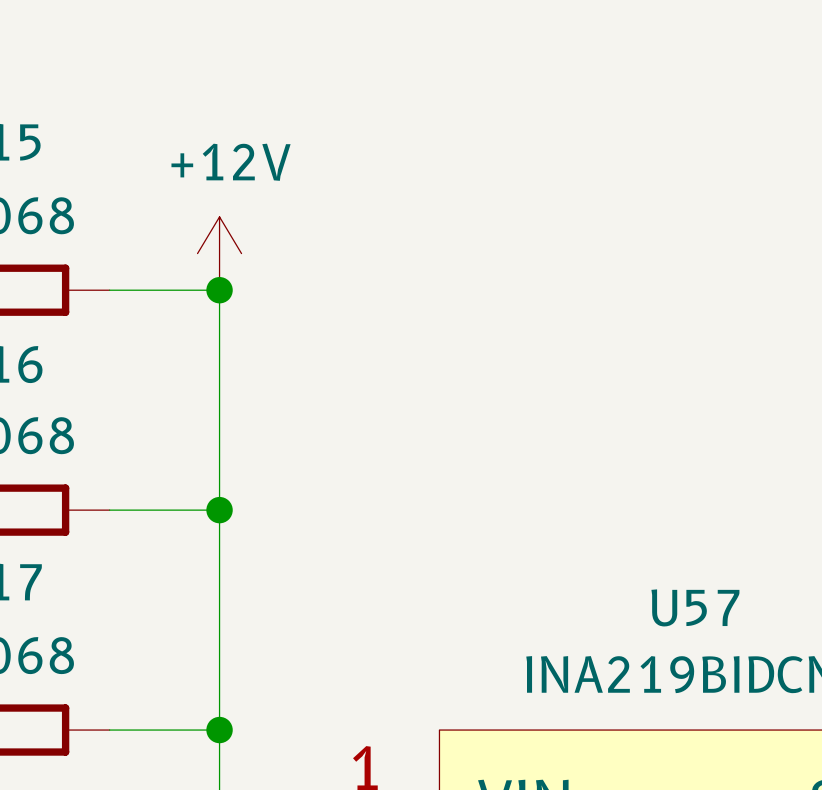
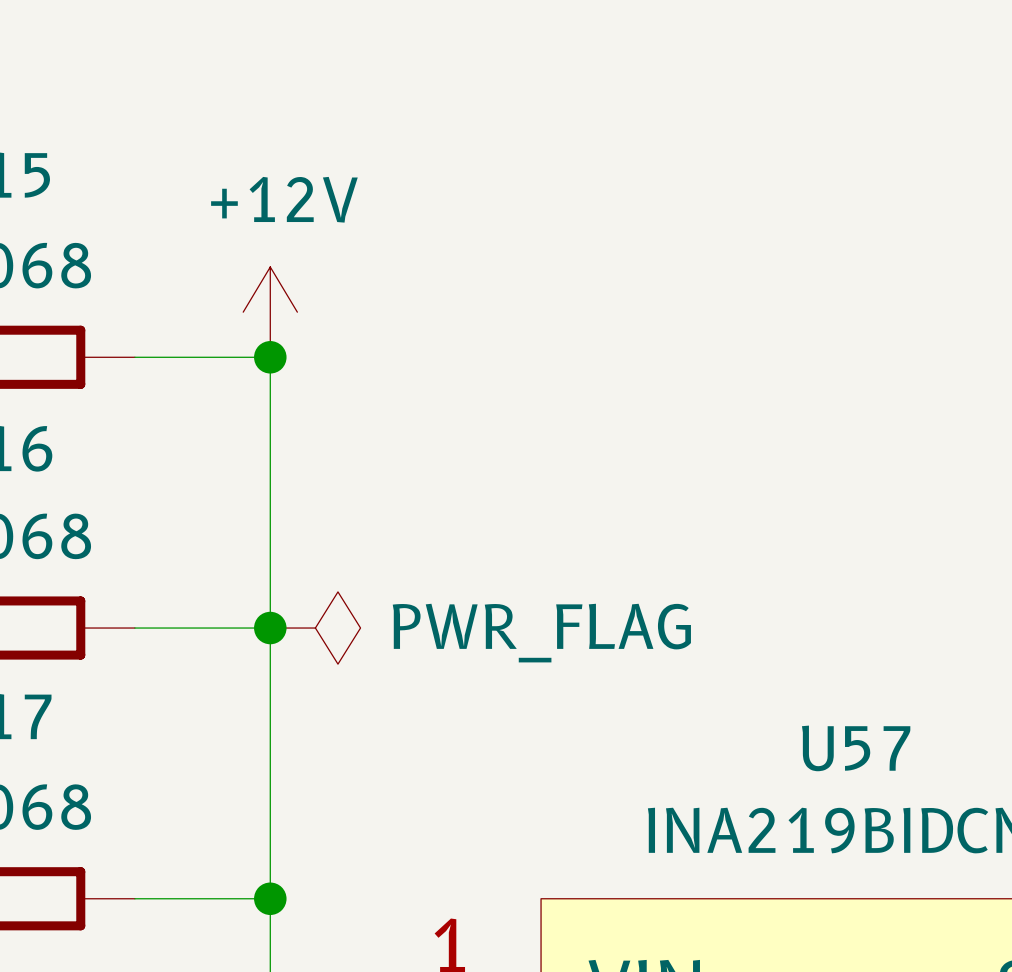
power symbol: none -> PWR_FLAG (315, 628)

